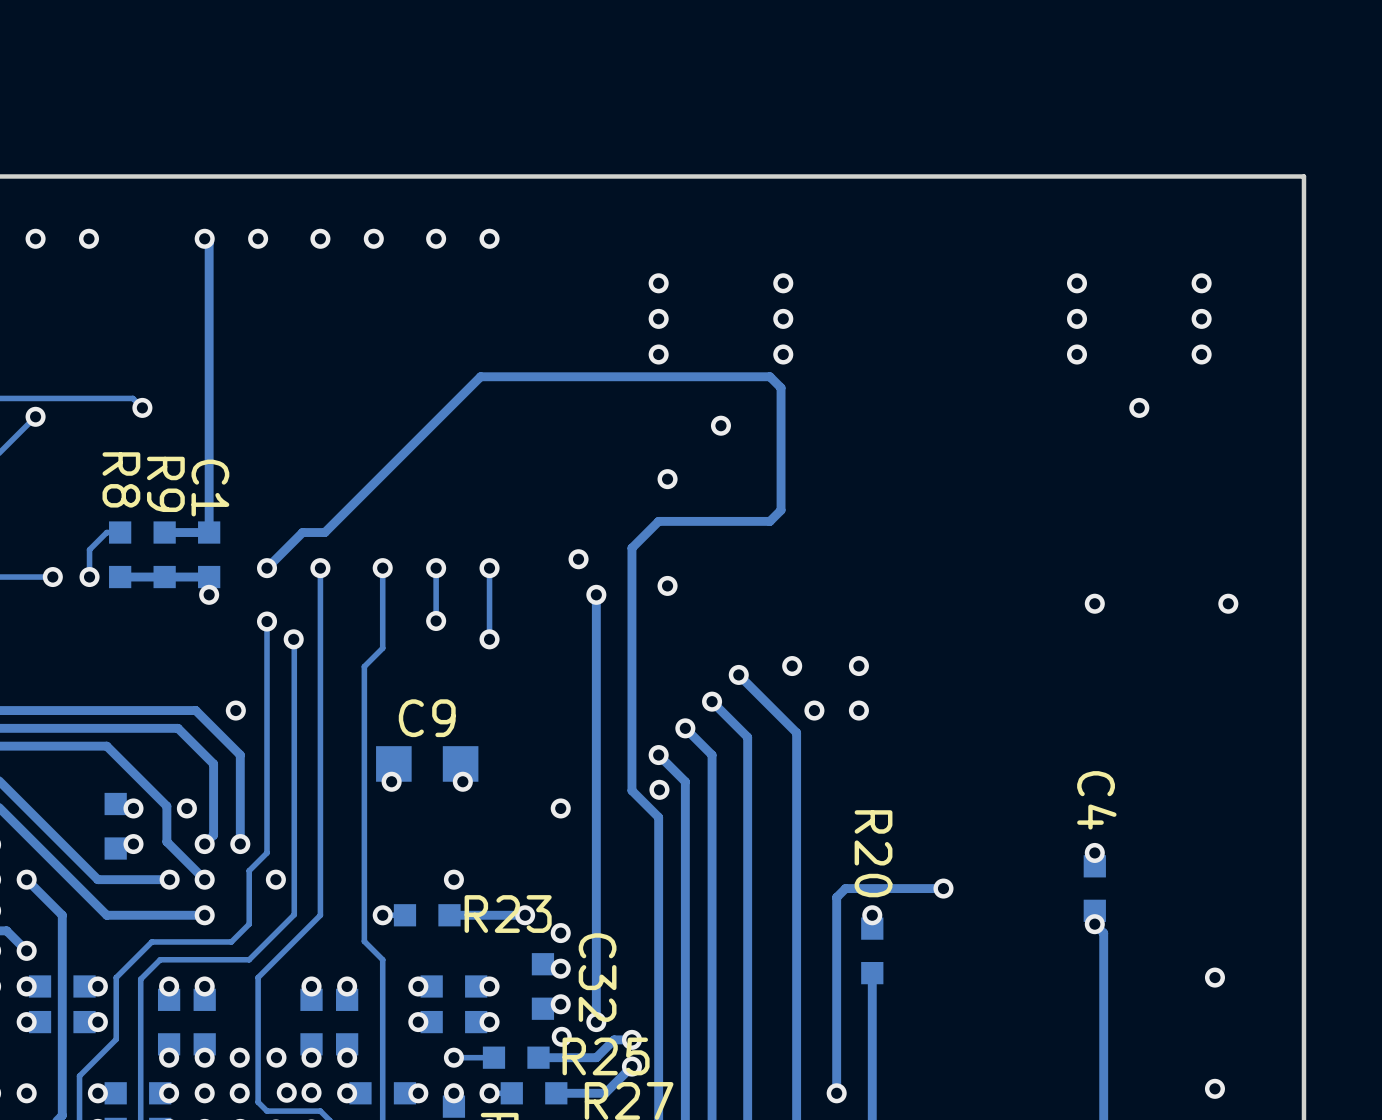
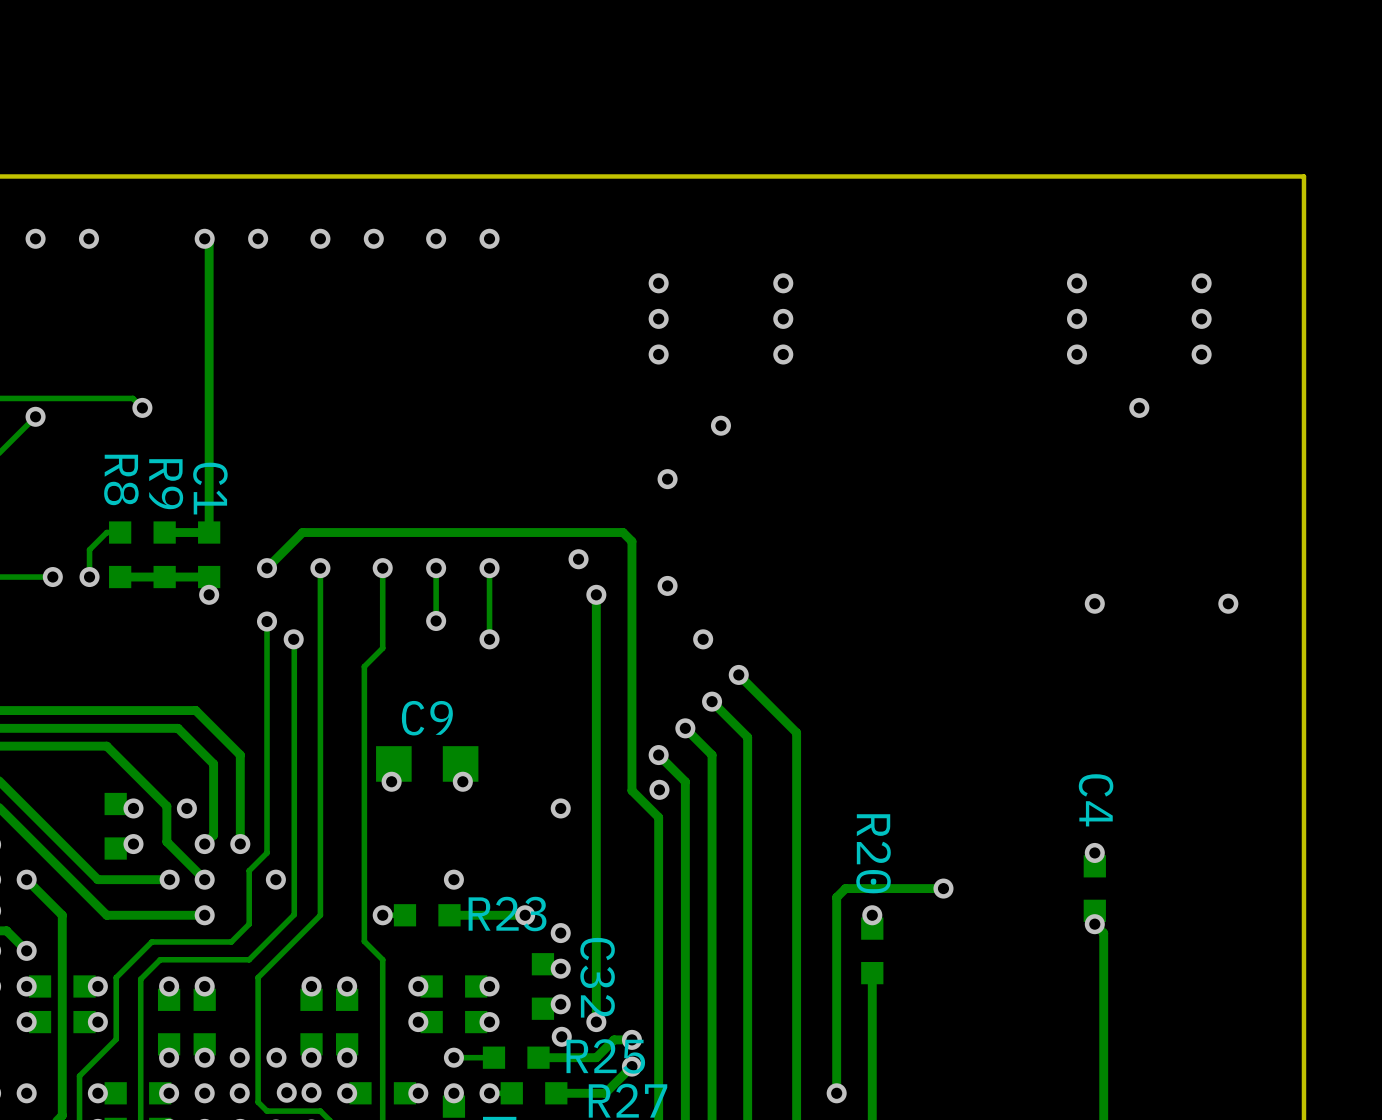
track: (324, 532) (480, 376) (769, 376) (781, 387) (781, 510) (769, 521) (658, 521) (631, 548) -> (324, 532) (623, 532) (631, 541) (631, 548)
via: none -> (703, 639)
via: (792, 666) -> none
via: (858, 666) -> none
via: (235, 710) -> none
via: (814, 710) -> none
via: (858, 710) -> none
via: (1214, 977) -> none
via: (1214, 1088) -> none

